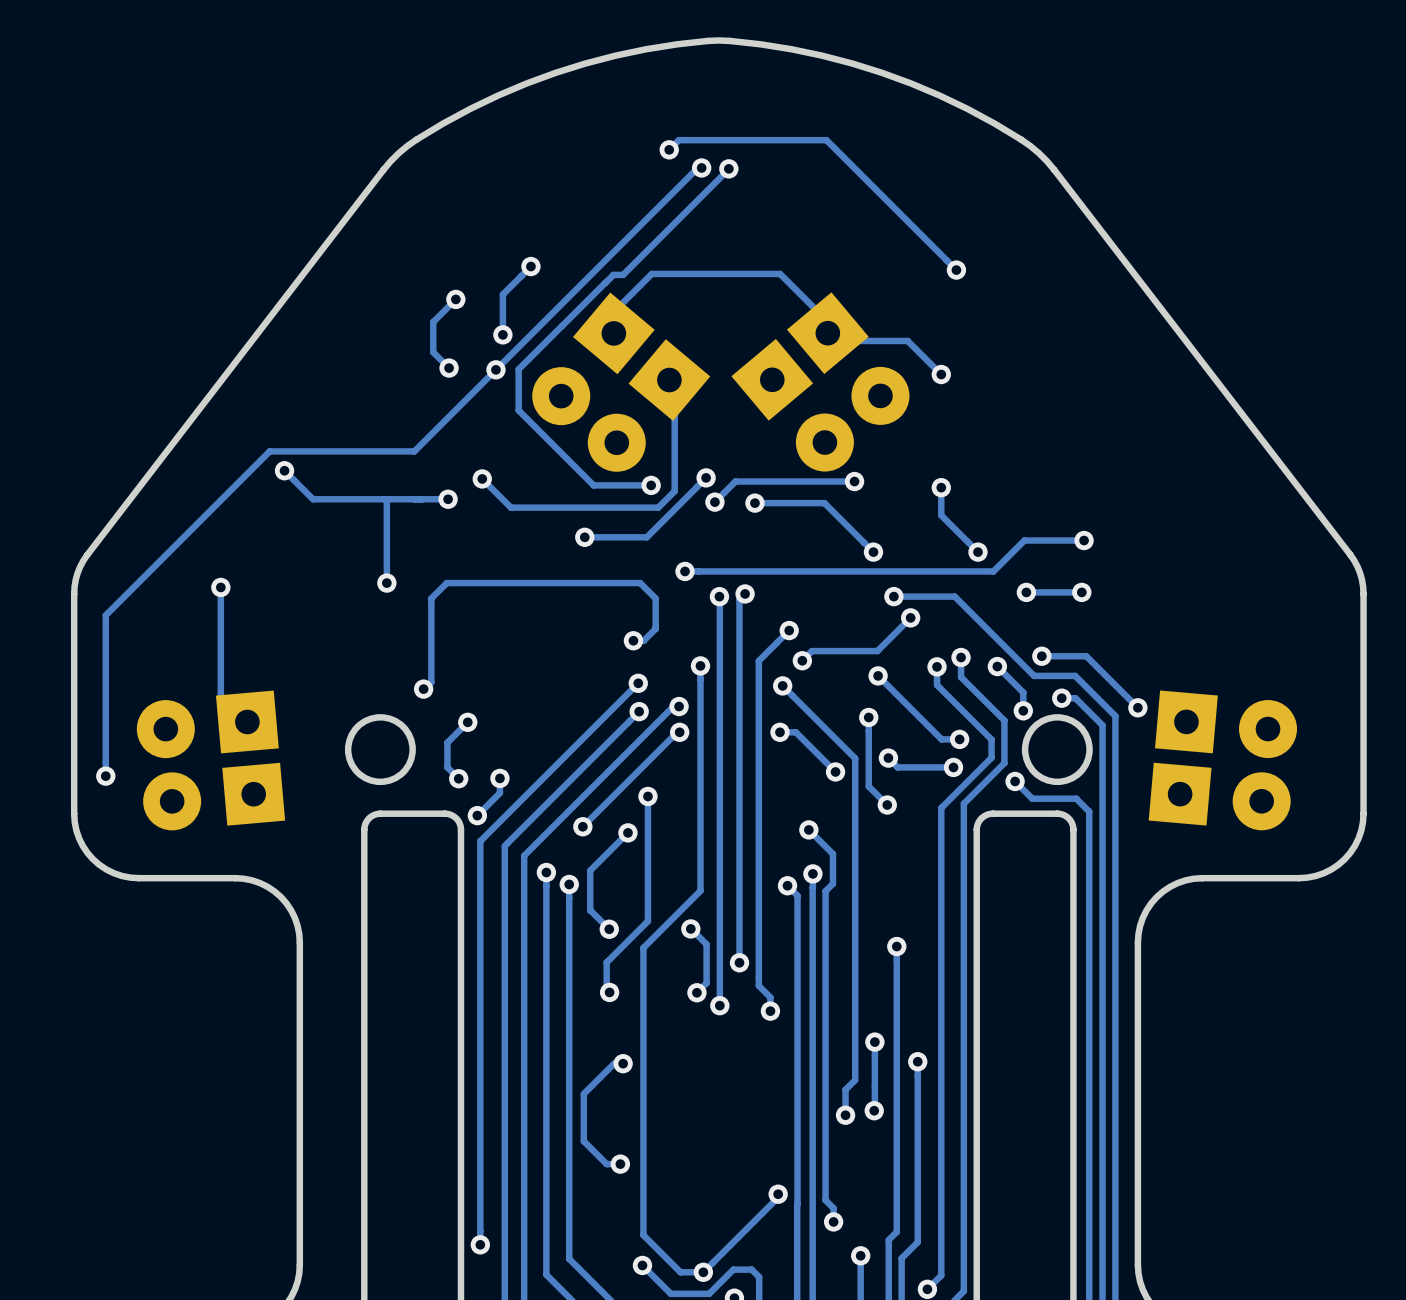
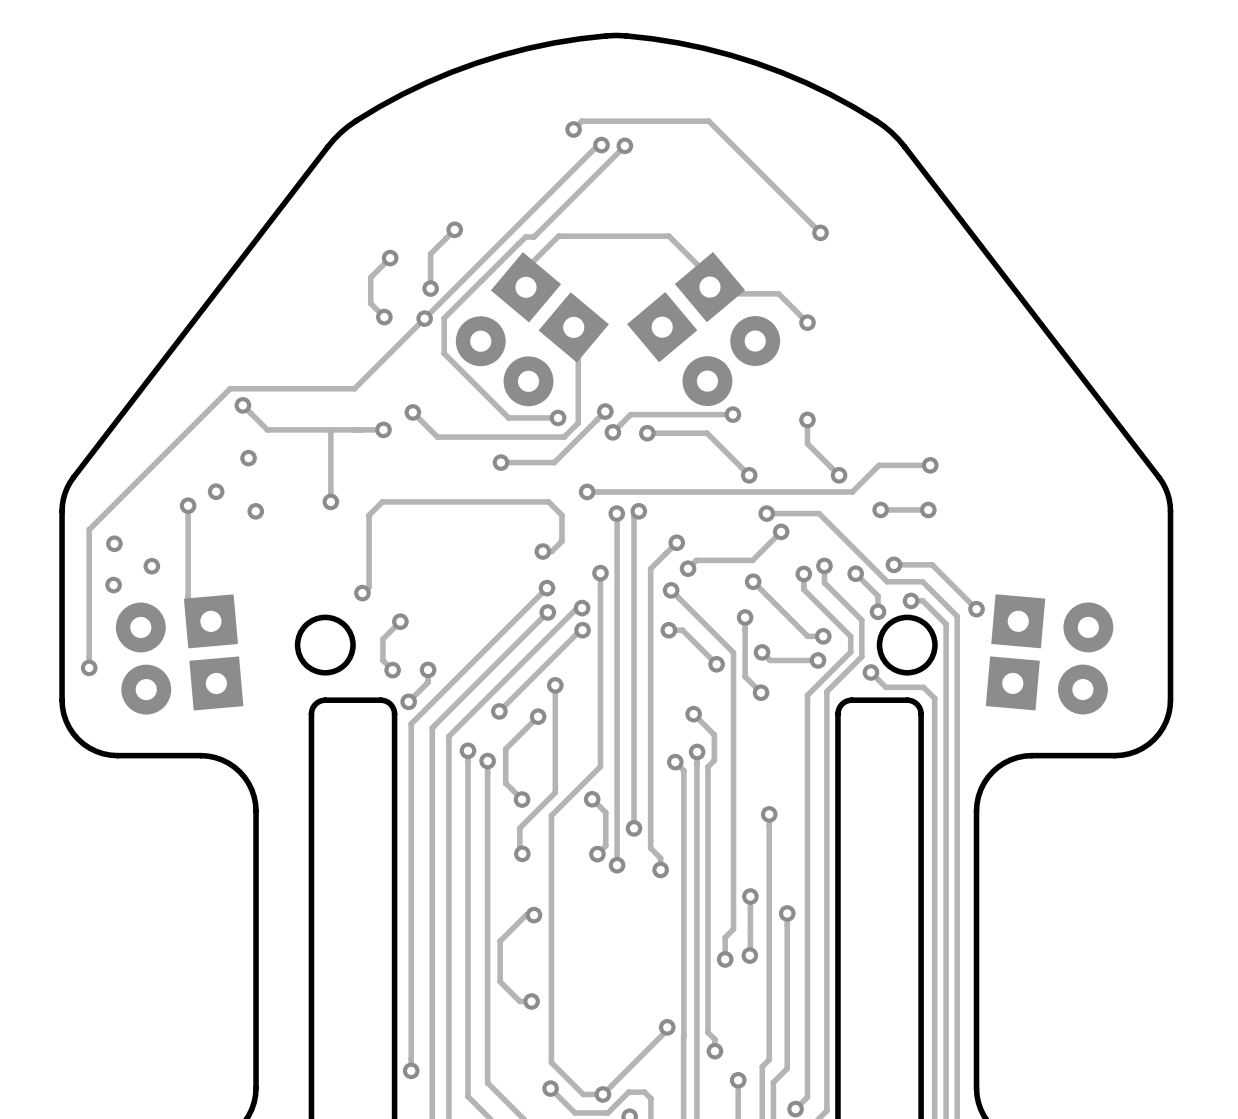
via: none -> (248, 458)
via: none -> (216, 491)
via: none -> (255, 511)
via: none -> (114, 543)
via: none -> (151, 566)
via: none -> (113, 585)

